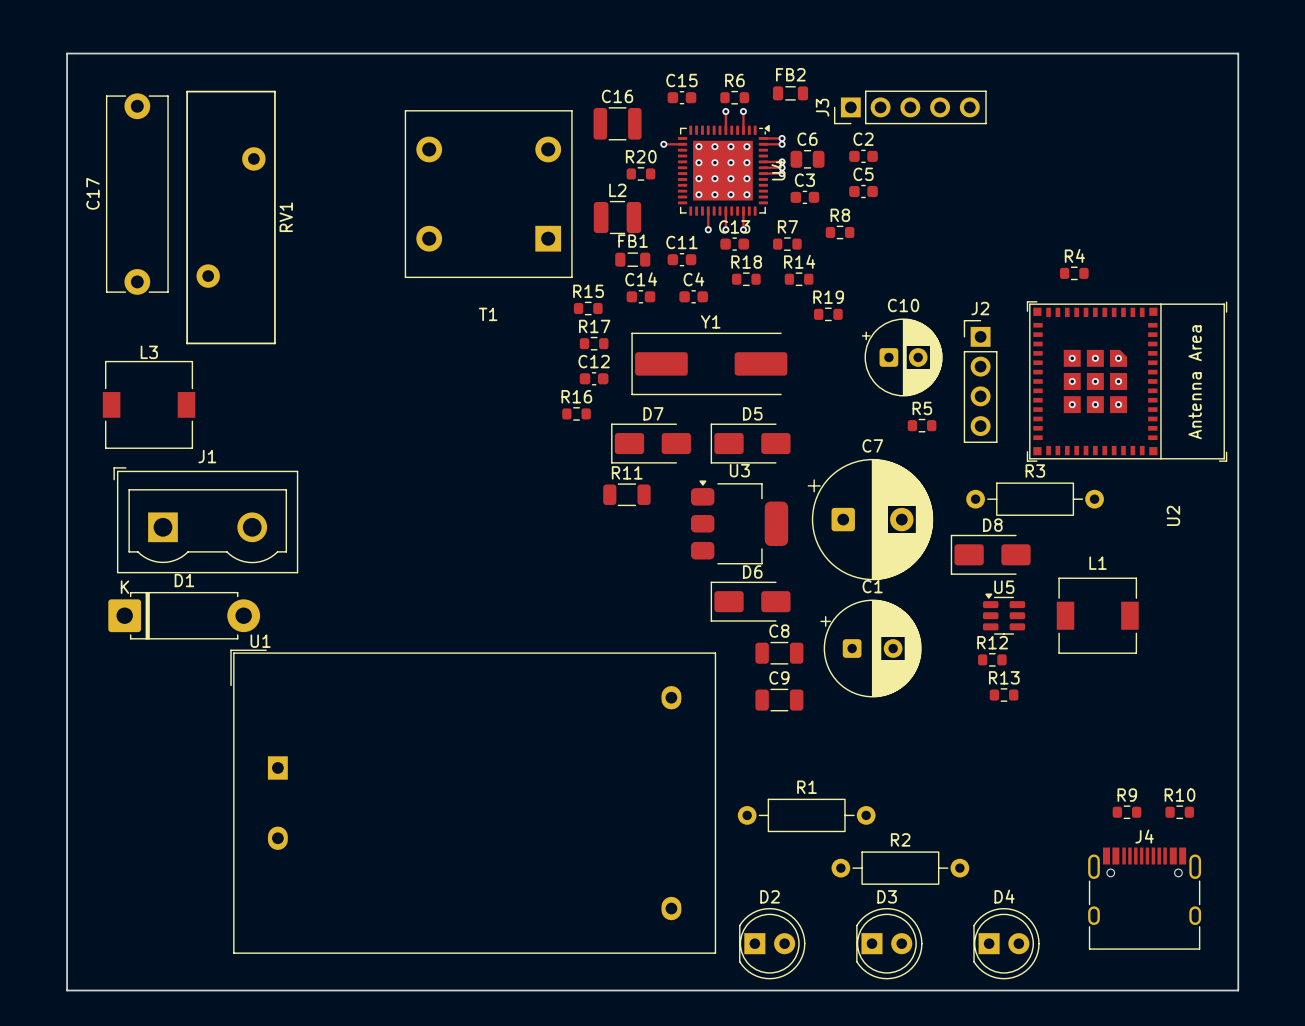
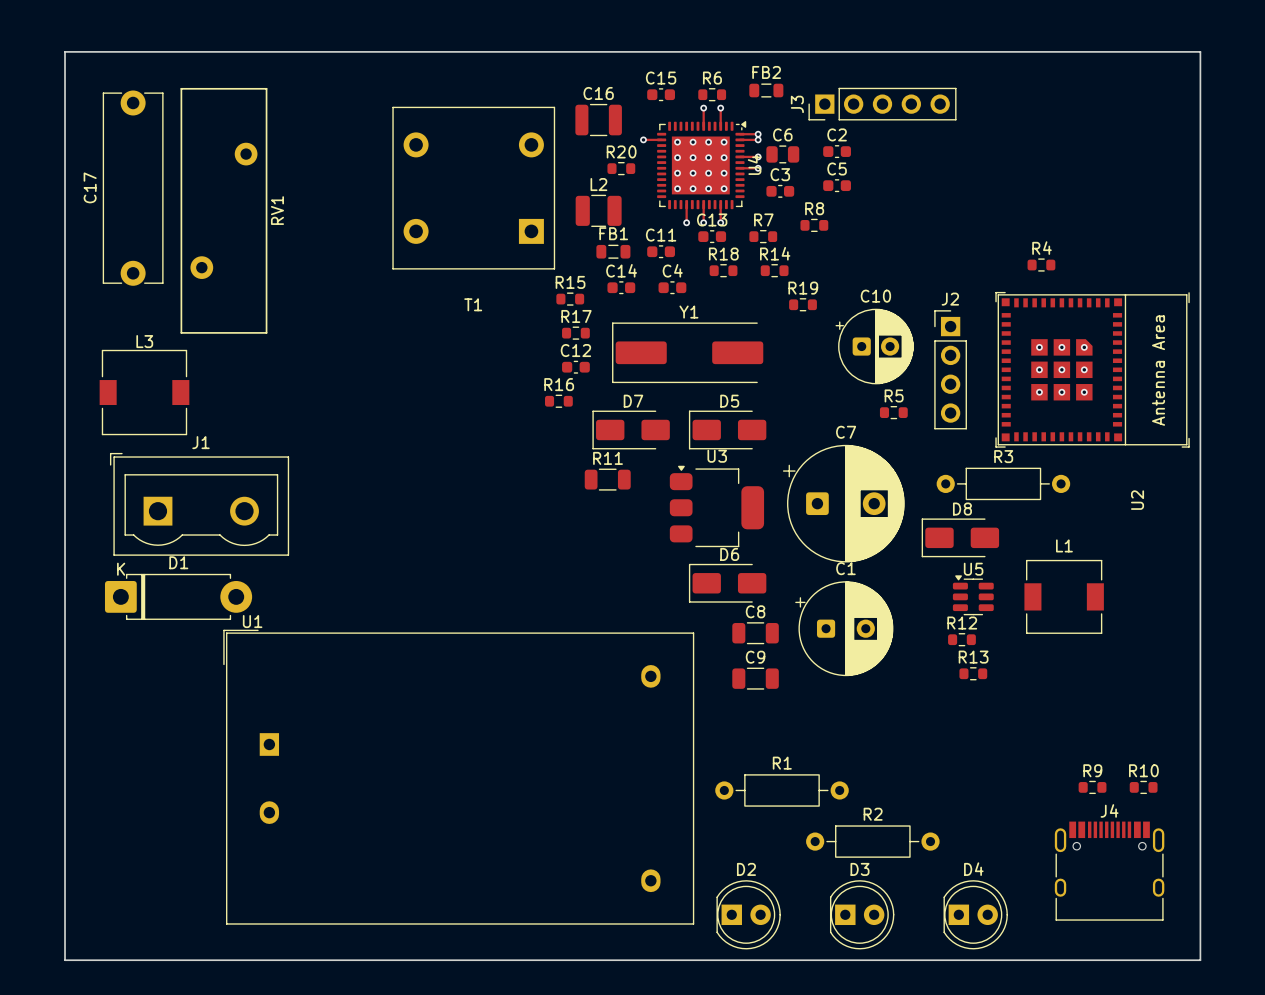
top track: (763, 167) (782, 167) -> none
via: (782, 167) -> none

